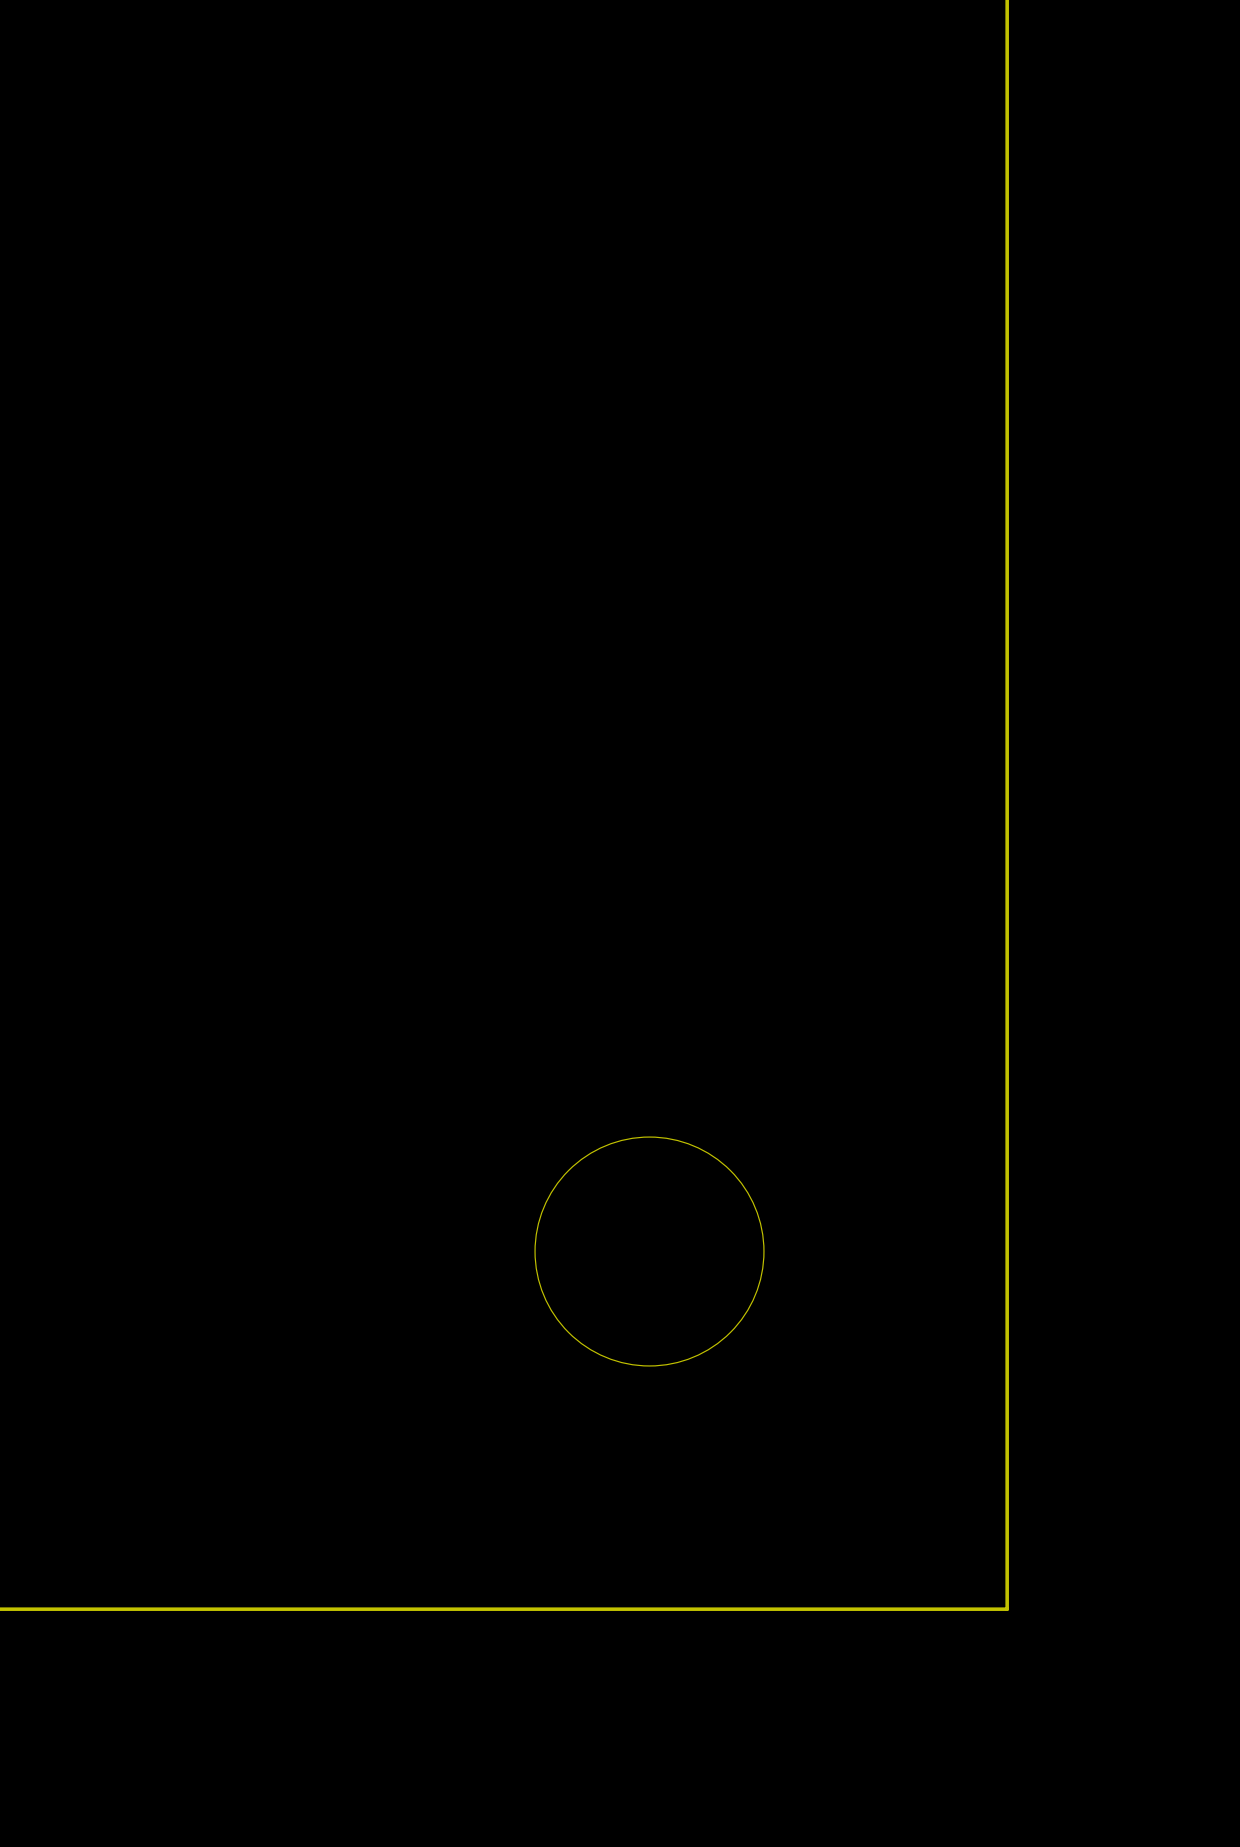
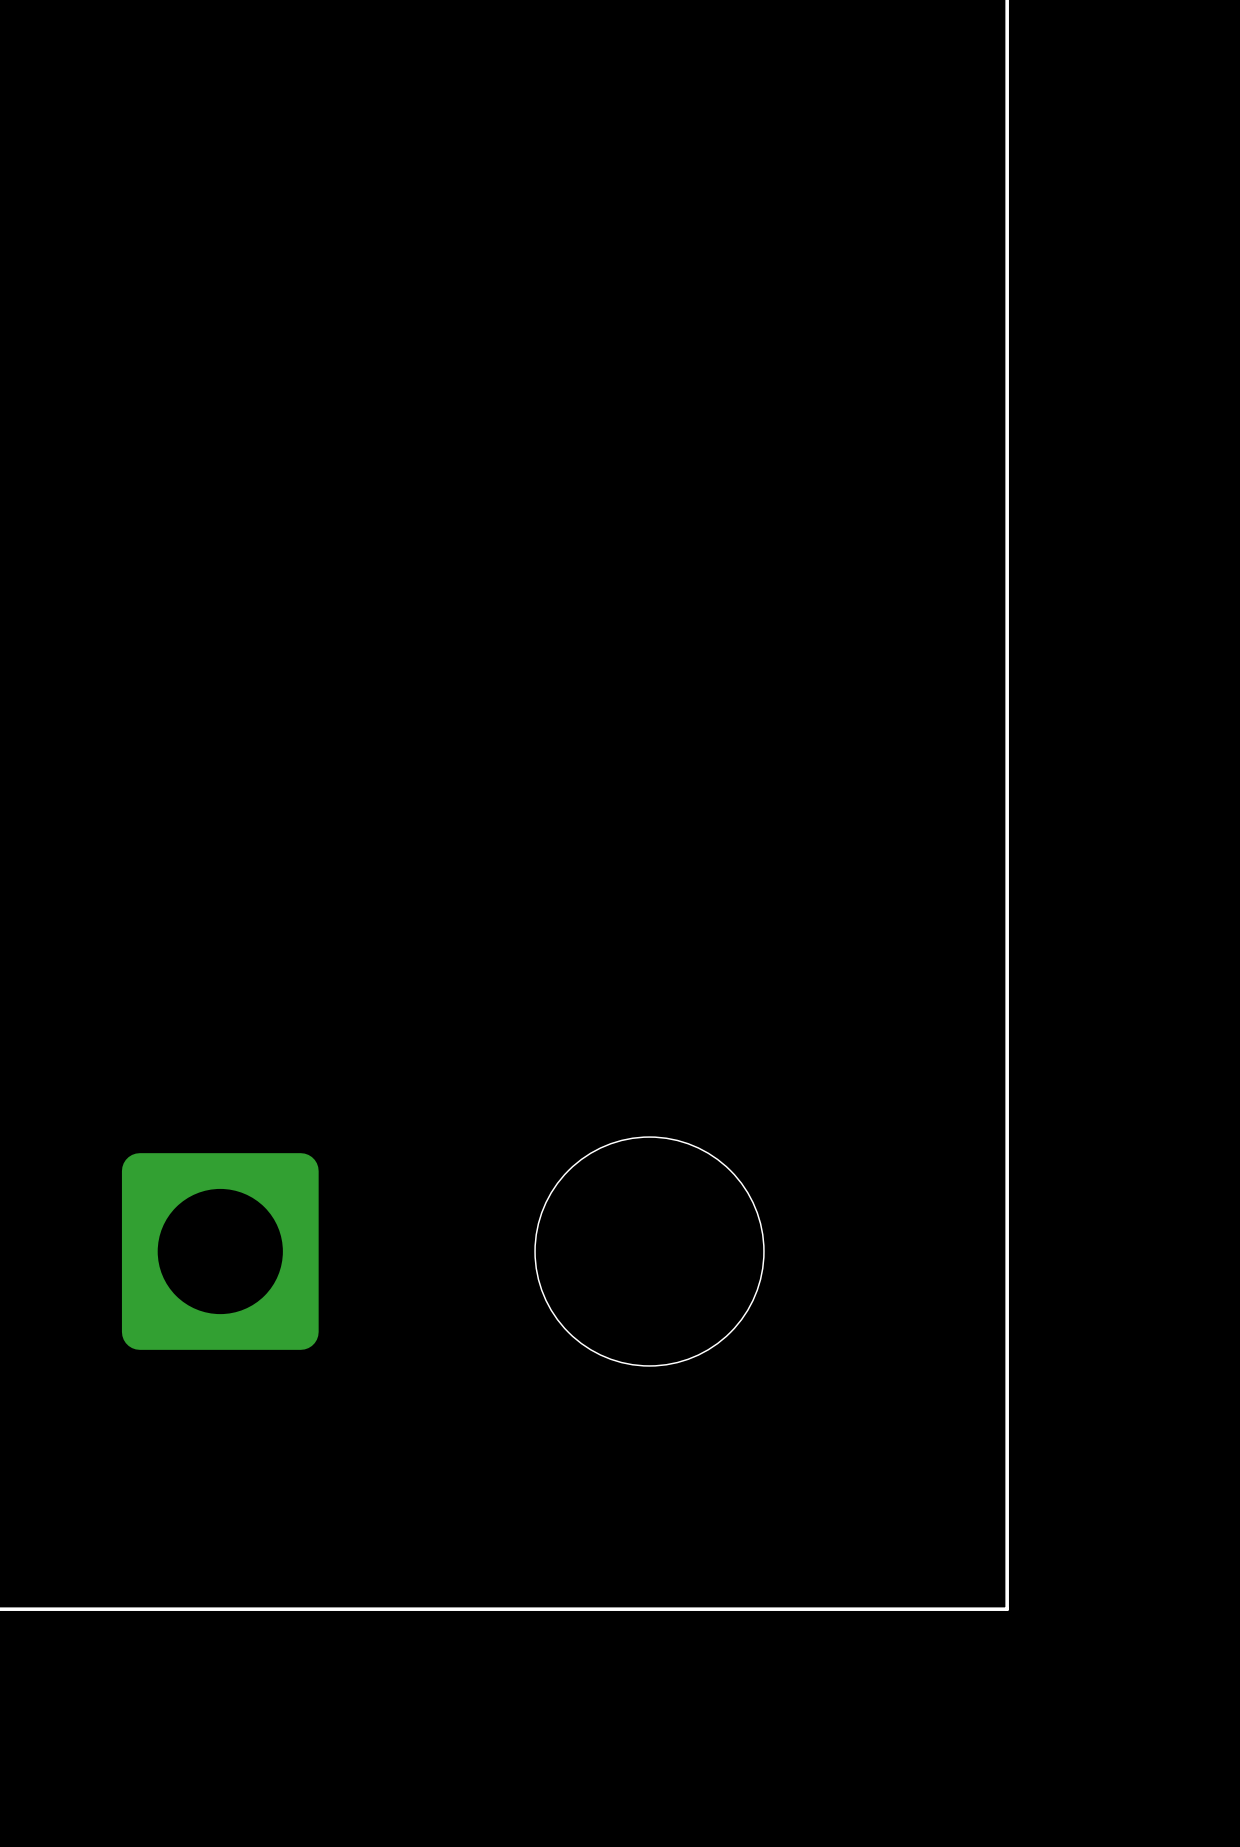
part: none -> (220, 1251)

